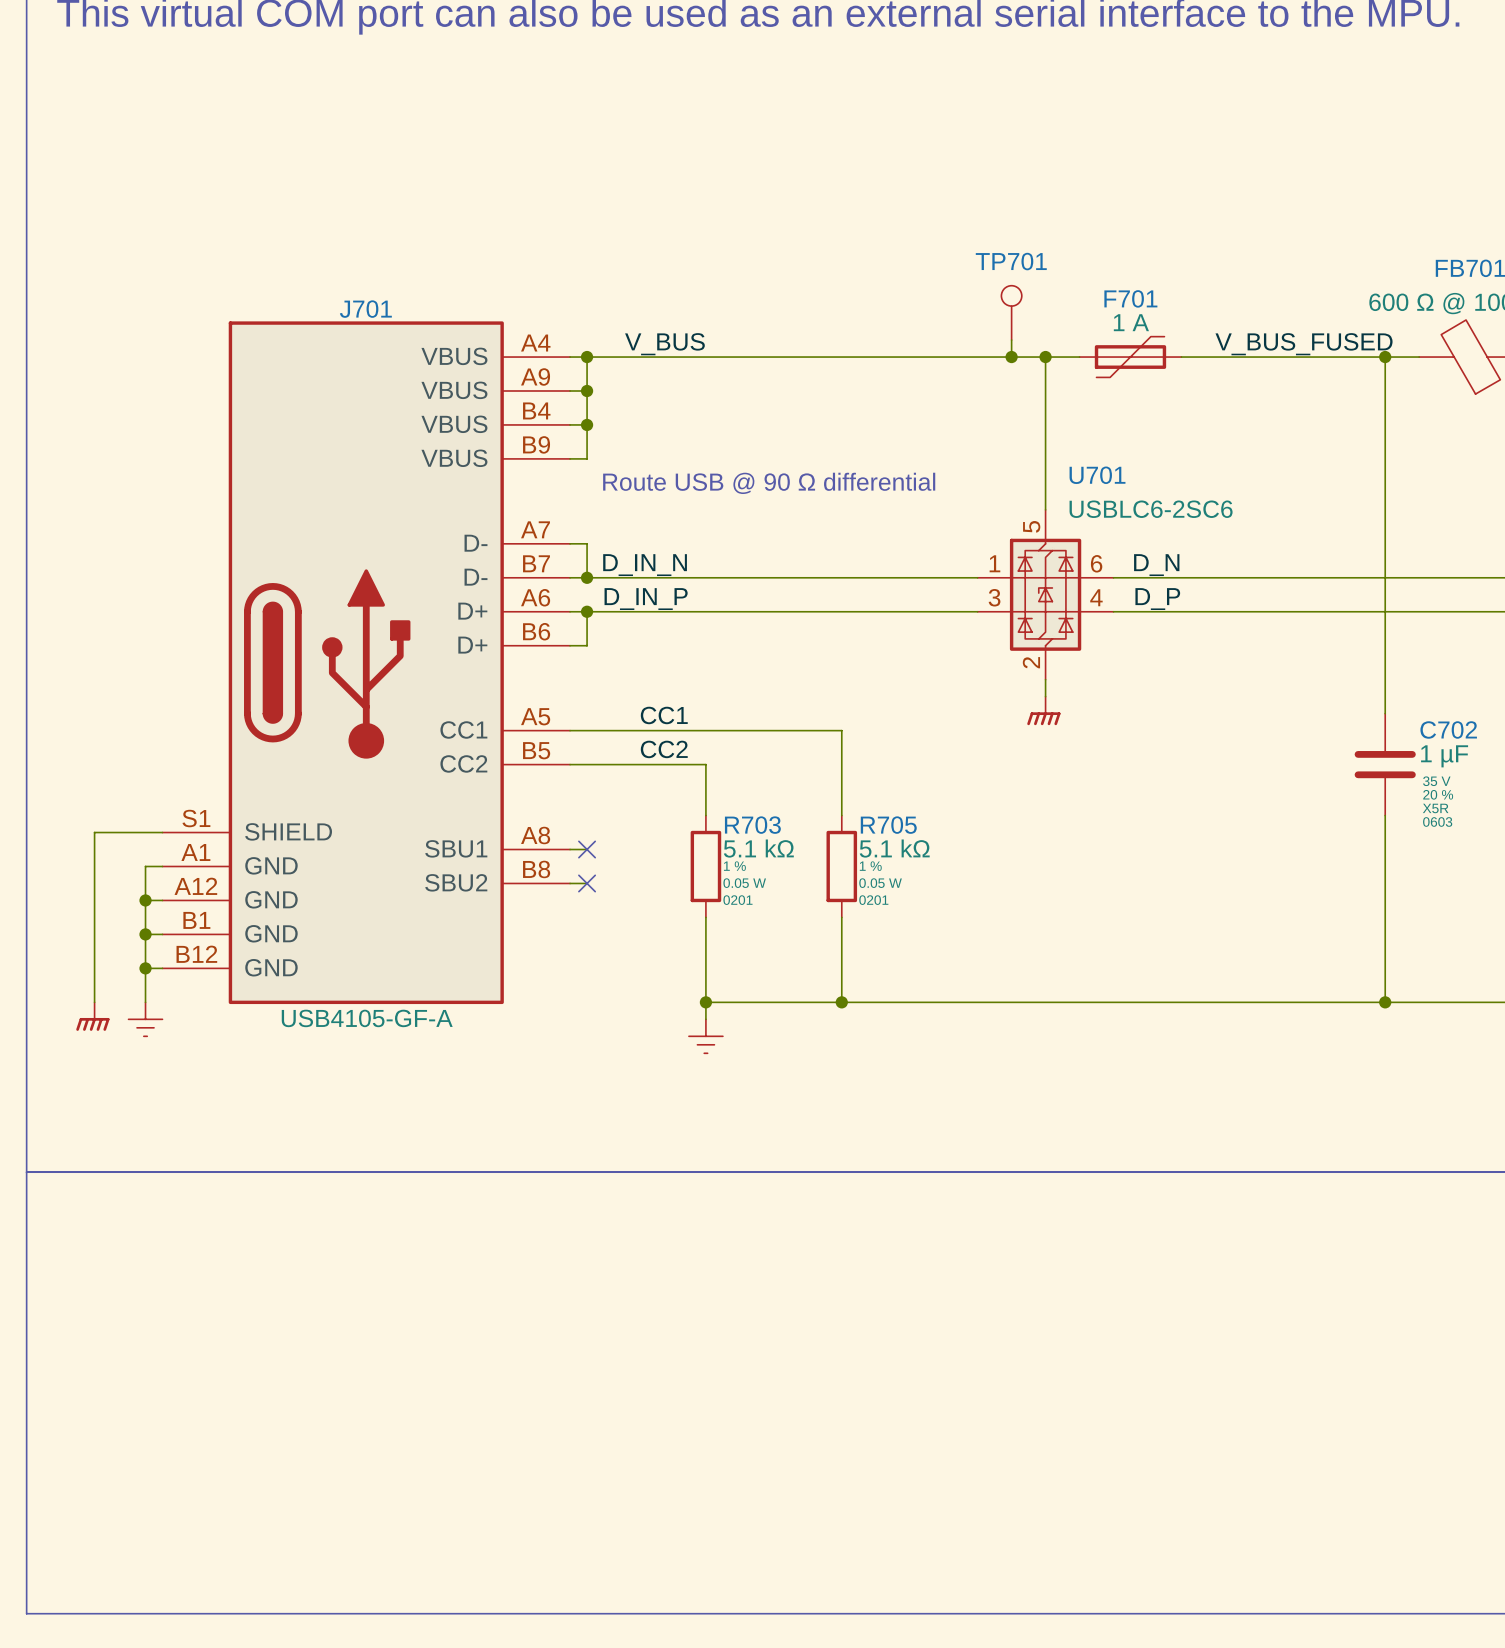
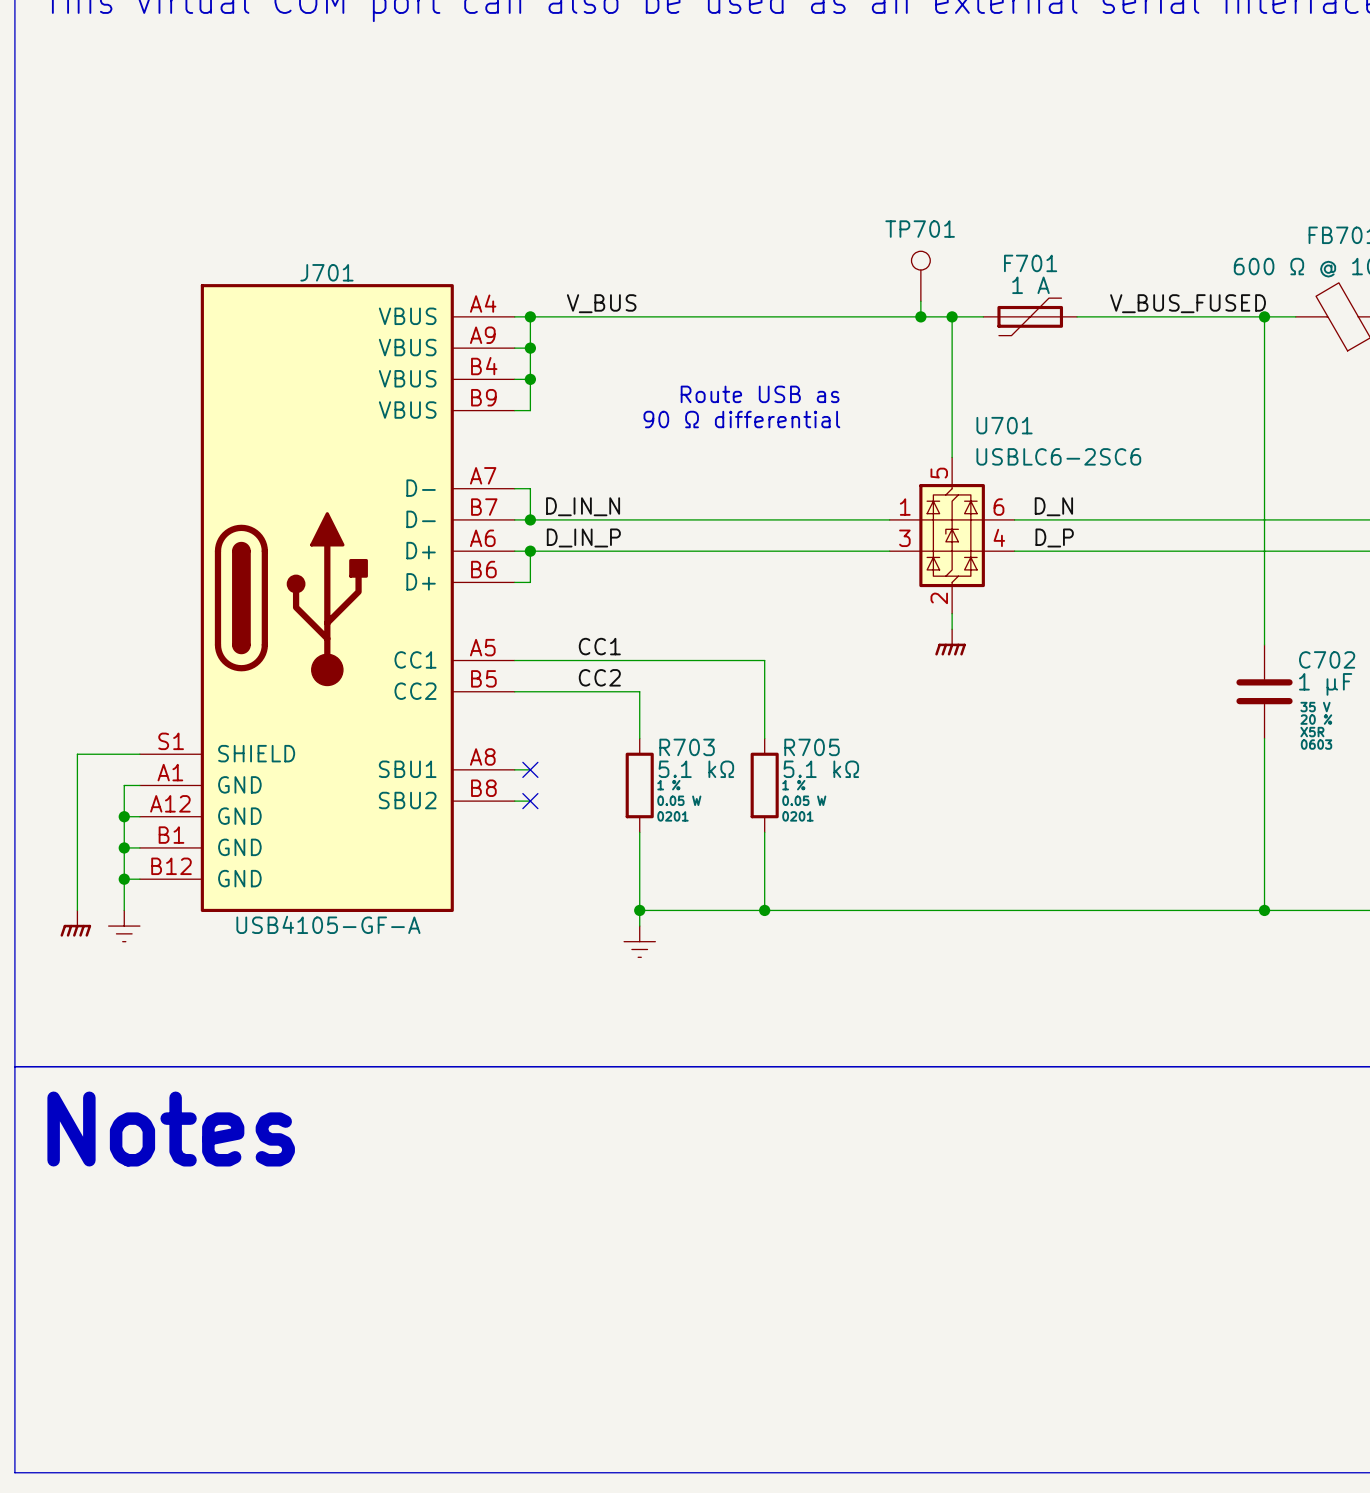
text: none -> Route USB as (760, 394)
text: Route USB @ 90 Ω differential (769, 483) -> 90 Ω differential (741, 419)
text: none -> Notes (171, 1129)

